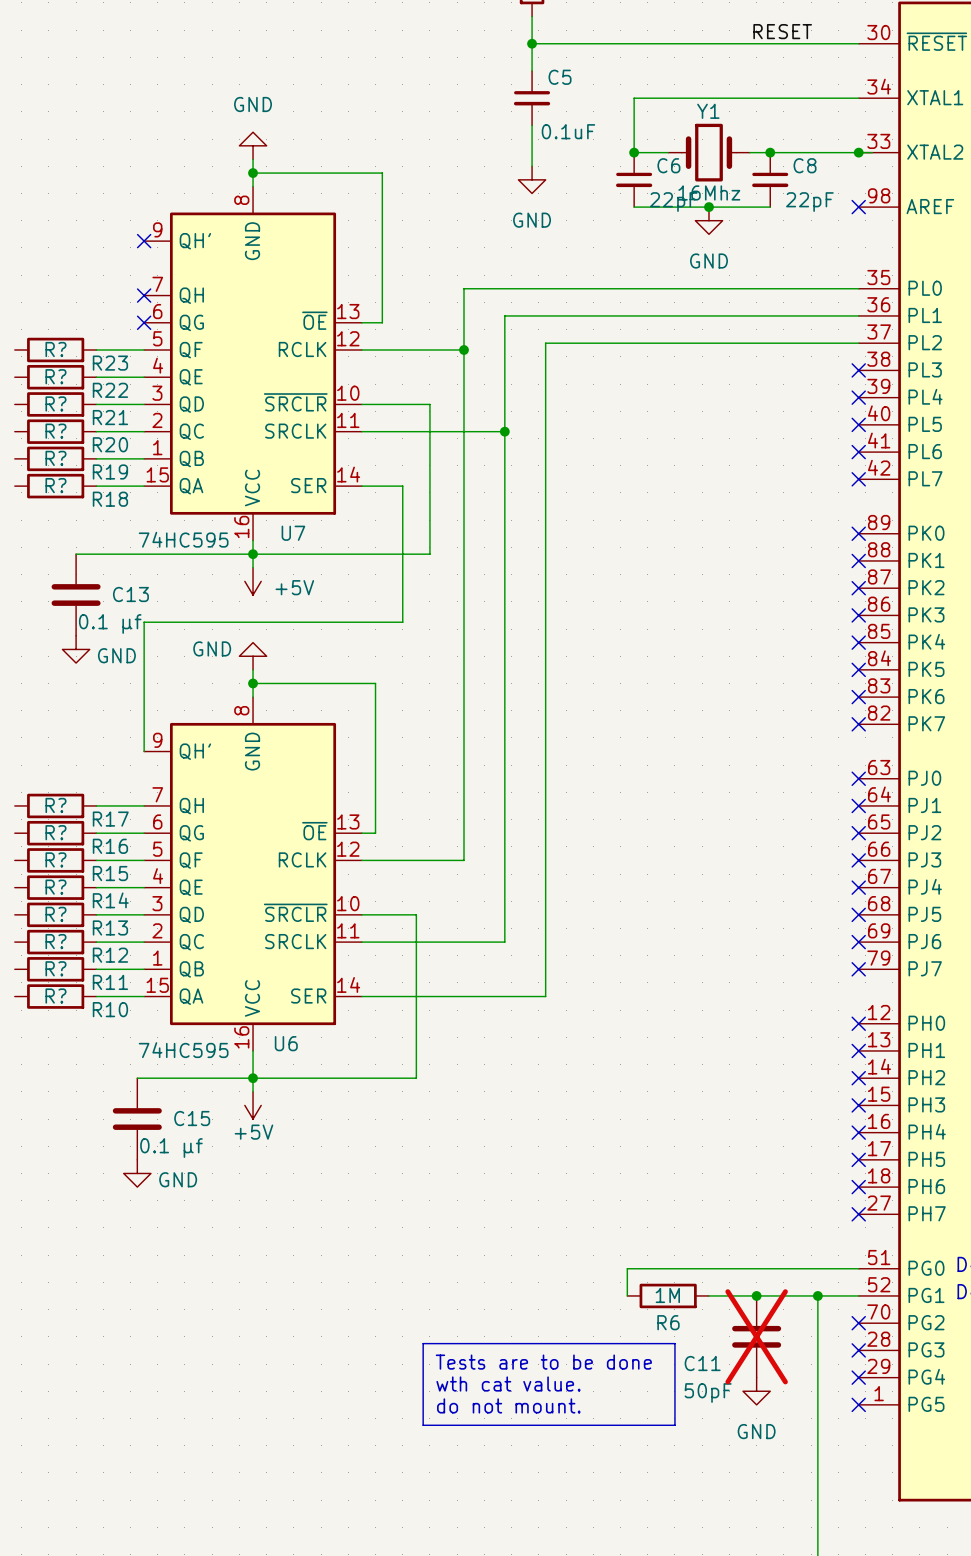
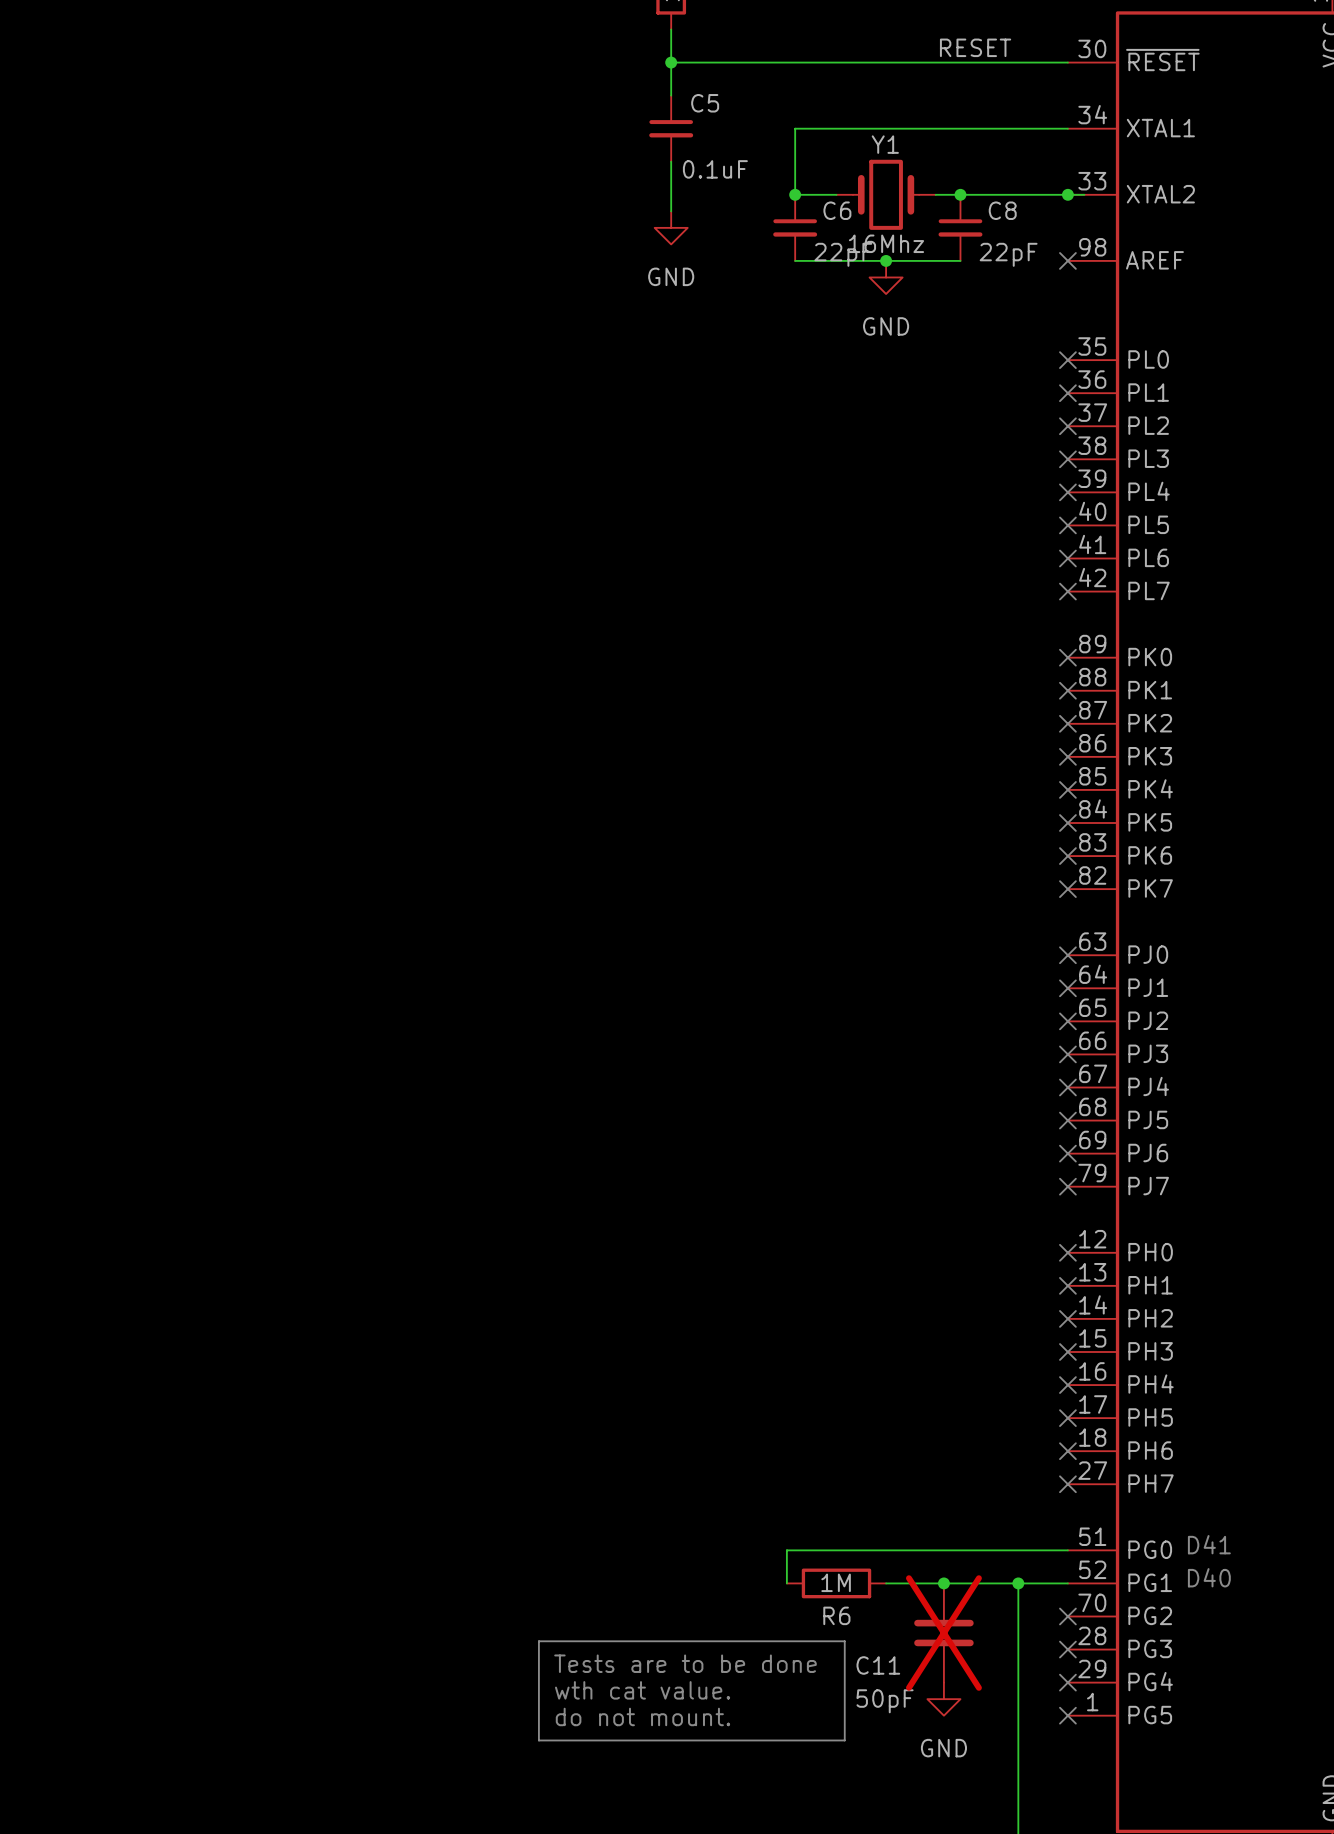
power symbol: GND (253, 145) -> none
wire: (253, 159) (253, 186) -> none
wire: (253, 173) (382, 173) (382, 322) (361, 322) -> none
junction: (253, 173) -> none
no-connect mark: (144, 241) -> none
wire: (858, 288) (463, 288) (463, 860) (361, 860) -> none
no-connect mark: none -> (1067, 360)
no-connect mark: (144, 295) -> none
wire: (858, 315) (504, 315) (504, 942) (361, 942) -> none
no-connect mark: none -> (1067, 393)
no-connect mark: (144, 322) -> none
wire: (858, 343) (545, 343) (545, 996) (361, 996) -> none
no-connect mark: none -> (1067, 426)
R23: R? (55, 350) -> none
wire: (96, 350) (144, 350) -> none
wire: (361, 350) (463, 350) -> none
junction: (463, 350) -> none
U7: 74HC595 (253, 363) -> none
R22: R? (55, 377) -> none
wire: (96, 377) (144, 377) -> none
R21: R? (55, 404) -> none
wire: (96, 404) (144, 404) -> none
wire: (361, 404) (429, 404) (429, 554) (76, 554) -> none
R20: R? (55, 431) -> none
wire: (96, 431) (144, 431) -> none
wire: (361, 431) (504, 431) -> none
junction: (504, 431) -> none
R19: R? (55, 458) -> none
wire: (96, 458) (144, 458) -> none
R18: R? (55, 486) -> none
wire: (96, 486) (144, 486) -> none
wire: (361, 486) (402, 486) (402, 622) (144, 622) (144, 751) -> none
wire: (253, 540) (253, 567) -> none
junction: (253, 554) -> none
power symbol: +5V (253, 581) -> none
C13: 0.1 µf (76, 595) -> none
power symbol: GND (76, 649) -> none
power symbol: GND (253, 656) -> none
wire: (253, 669) (253, 697) -> none
wire: (253, 683) (375, 683) (375, 833) (361, 833) -> none
junction: (253, 683) -> none
R17: R? (55, 805) -> none
wire: (96, 805) (144, 805) -> none
R16: R? (55, 833) -> none
wire: (96, 833) (144, 833) -> none
R15: R? (55, 860) -> none
wire: (96, 860) (144, 860) -> none
U6: 74HC595 (253, 874) -> none
R14: R? (55, 887) -> none
wire: (96, 887) (144, 887) -> none
R13: R? (55, 914) -> none
wire: (96, 914) (144, 914) -> none
wire: (361, 914) (416, 914) (416, 1078) (137, 1078) -> none
R12: R? (55, 942) -> none
wire: (96, 942) (144, 942) -> none
R11: R? (55, 969) -> none
wire: (96, 969) (144, 969) -> none
R10: R? (55, 996) -> none
wire: (96, 996) (144, 996) -> none
wire: (253, 1050) (253, 1091) -> none
junction: (253, 1078) -> none
power symbol: +5V (253, 1105) -> none
C15: 0.1 µf (137, 1119) -> none
power symbol: GND (137, 1173) -> none

